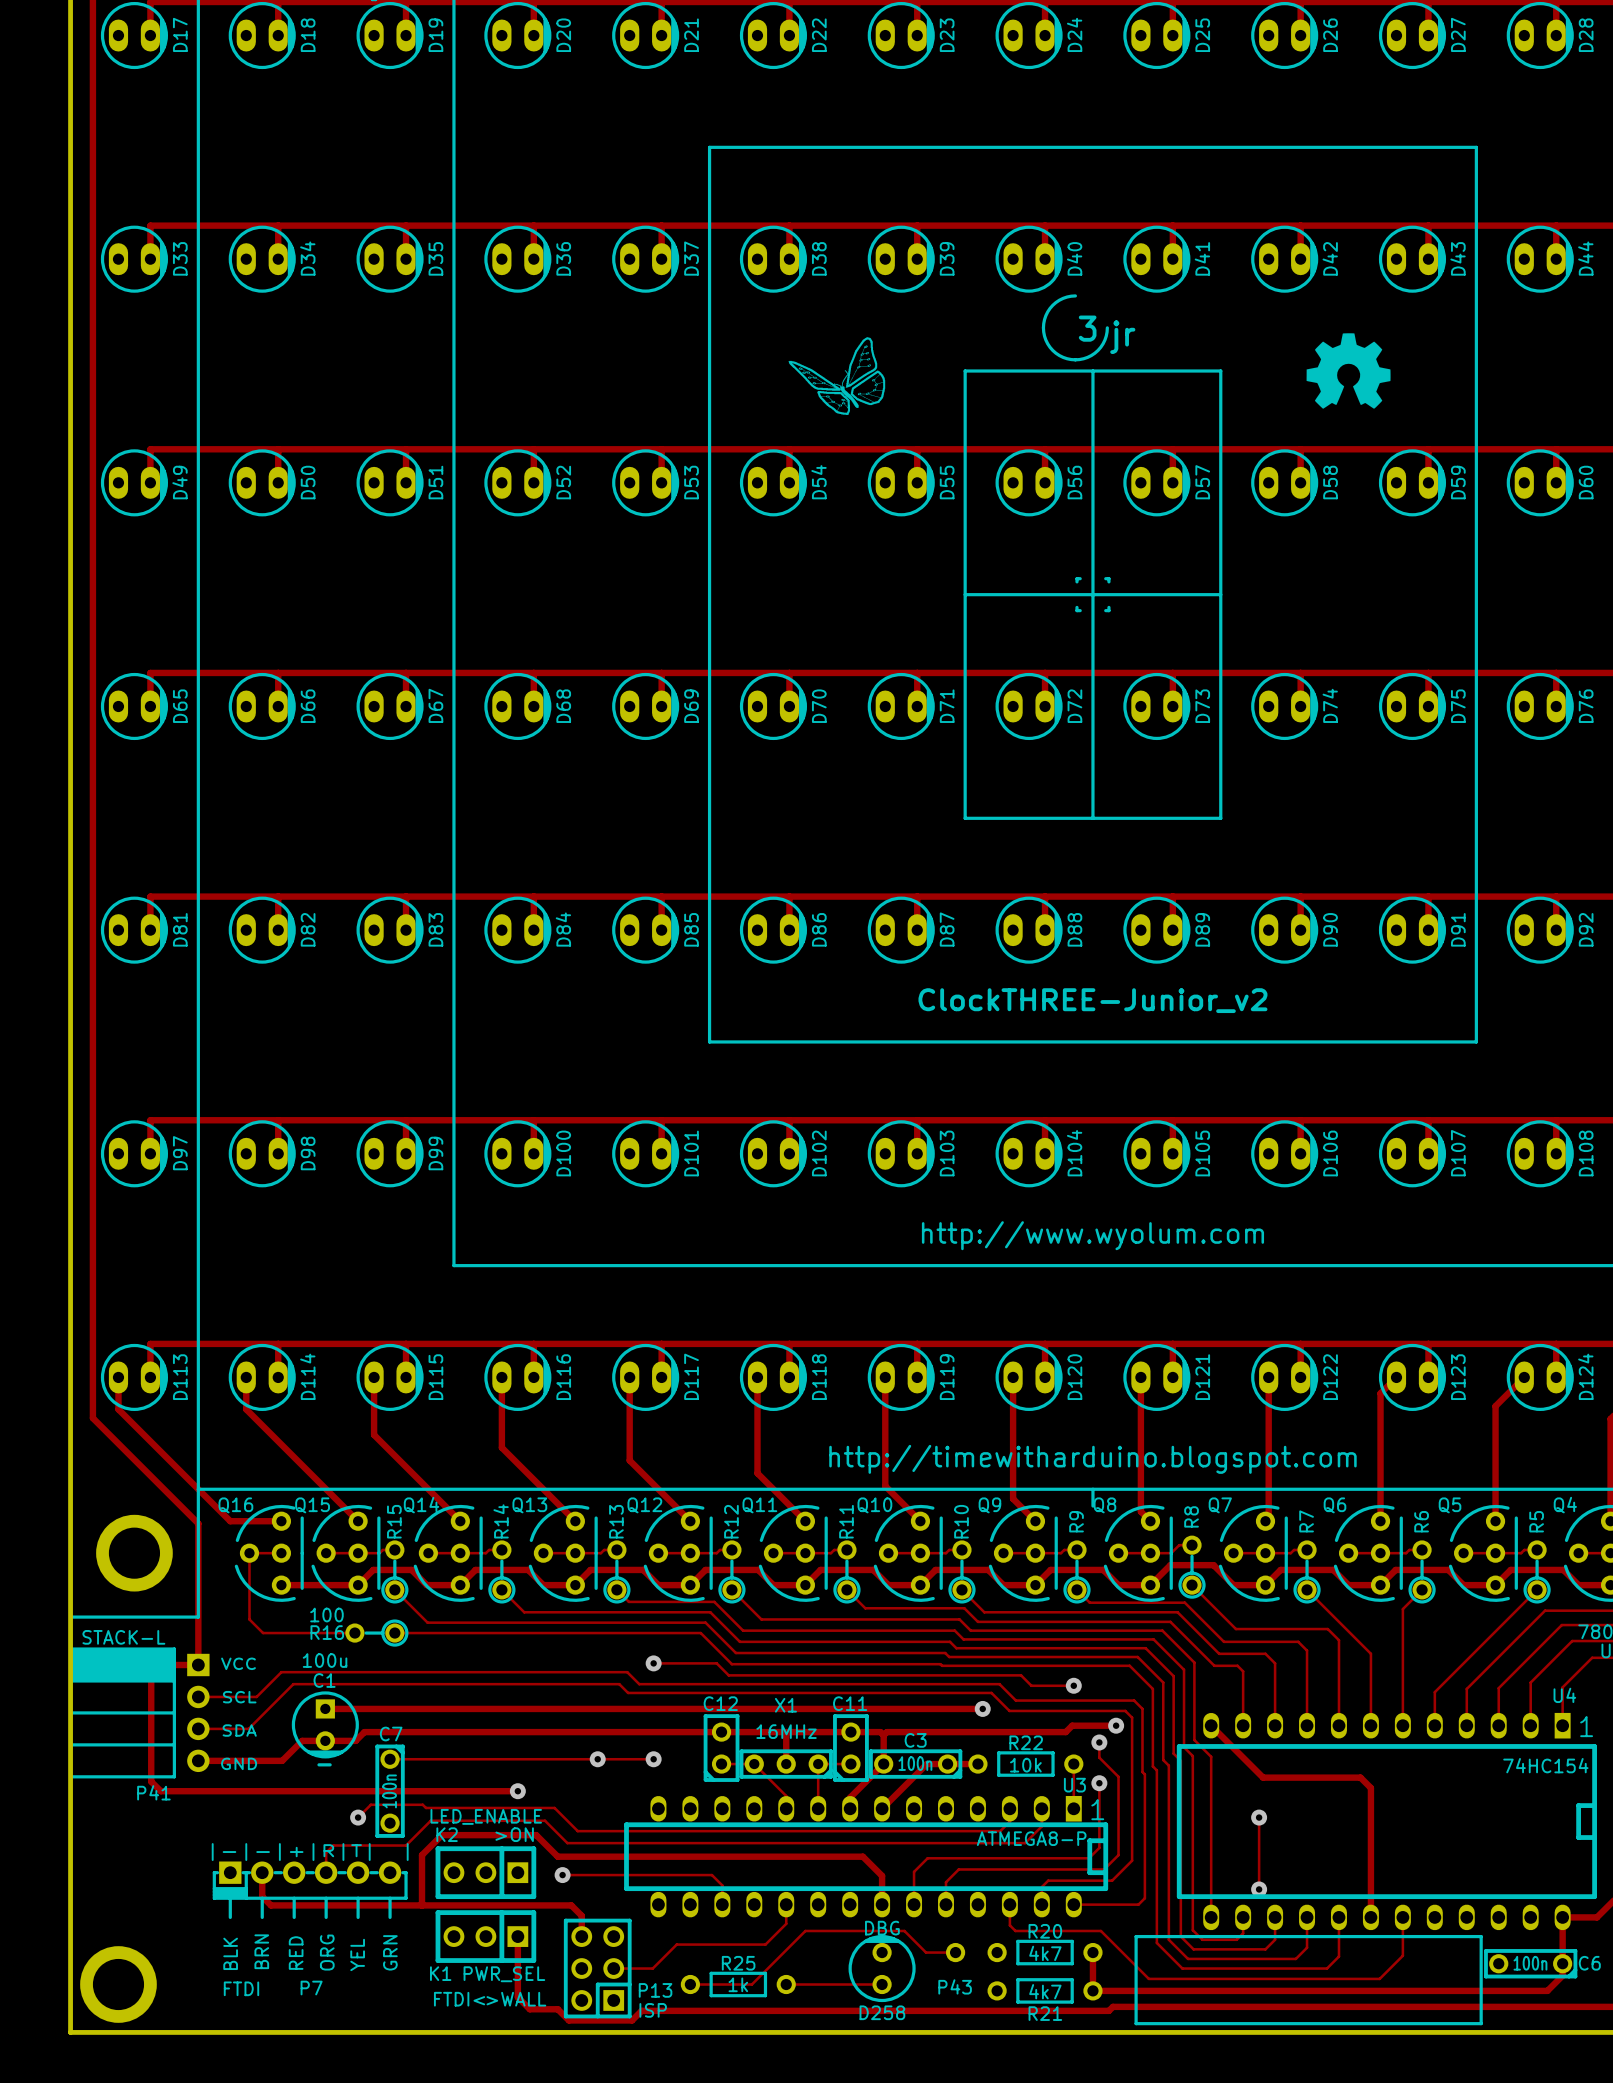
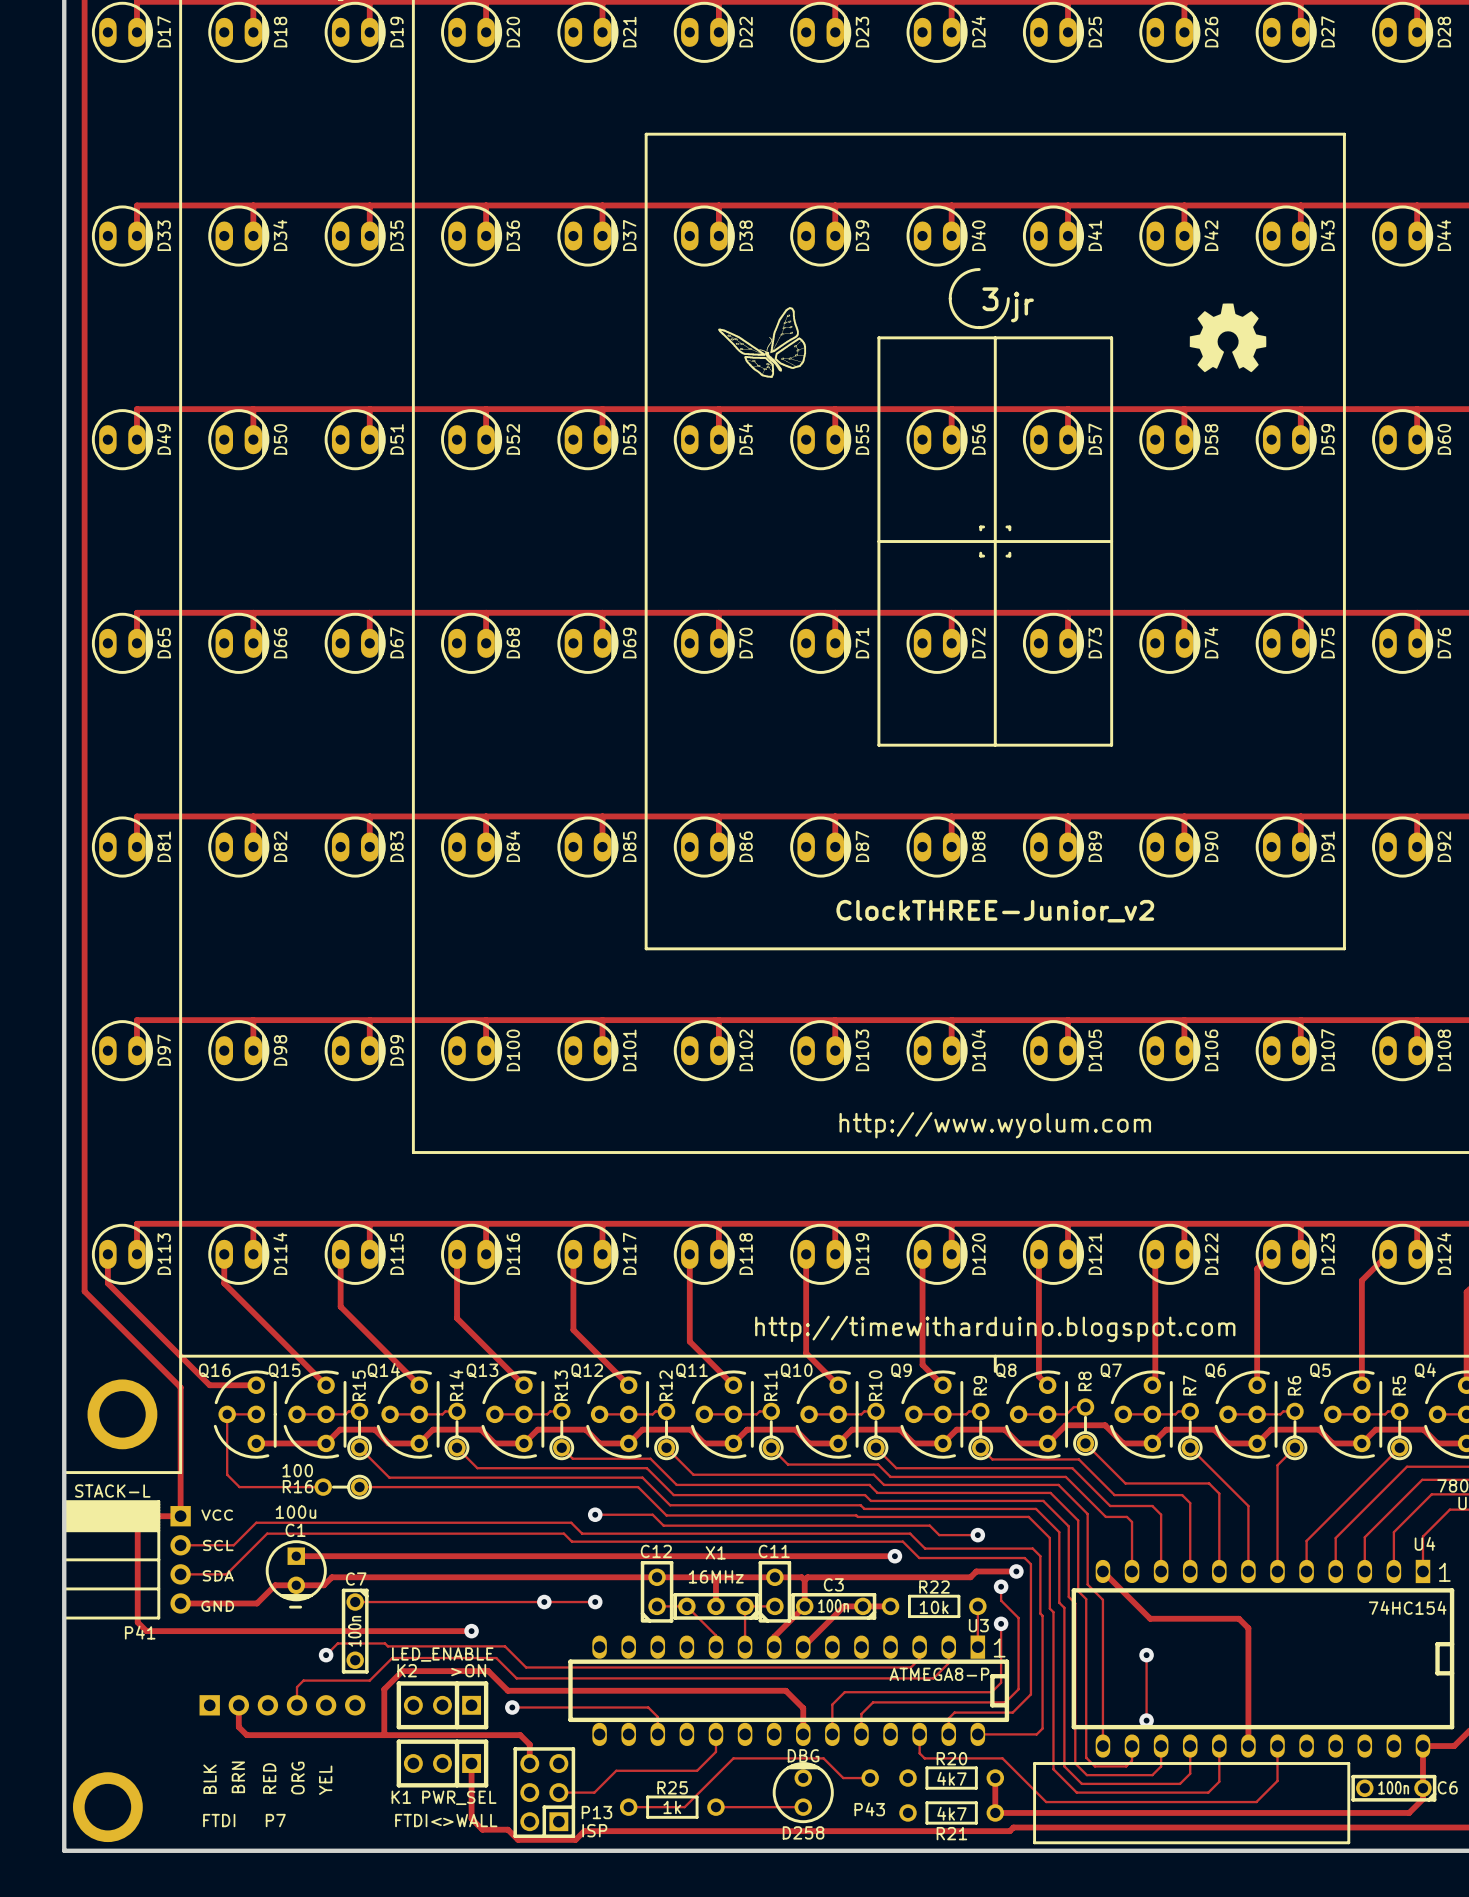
text: |-|-|+|R|T| | (310, 1852) -> none
P7 side: top (310, 1890) -> bottom (282, 1705)
text: GRN (390, 1952) -> none
text: none -> FTDI P7 (244, 1820)

